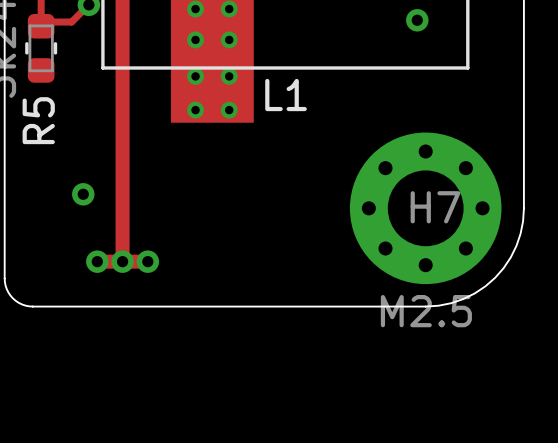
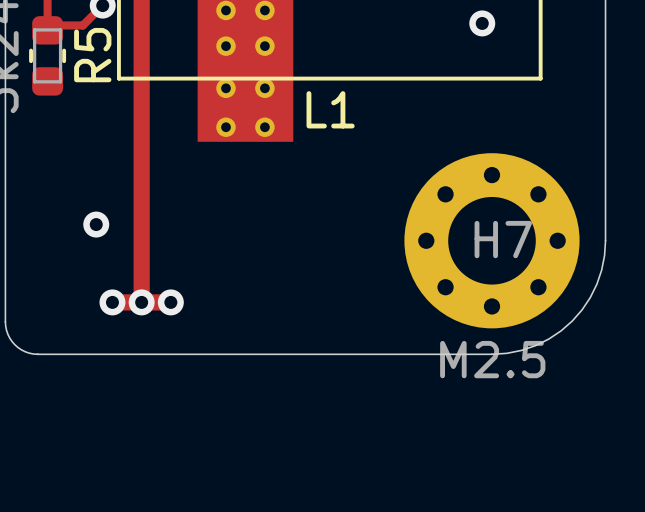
R5 name position: R5 (38, 120) -> R5 (92, 55)

